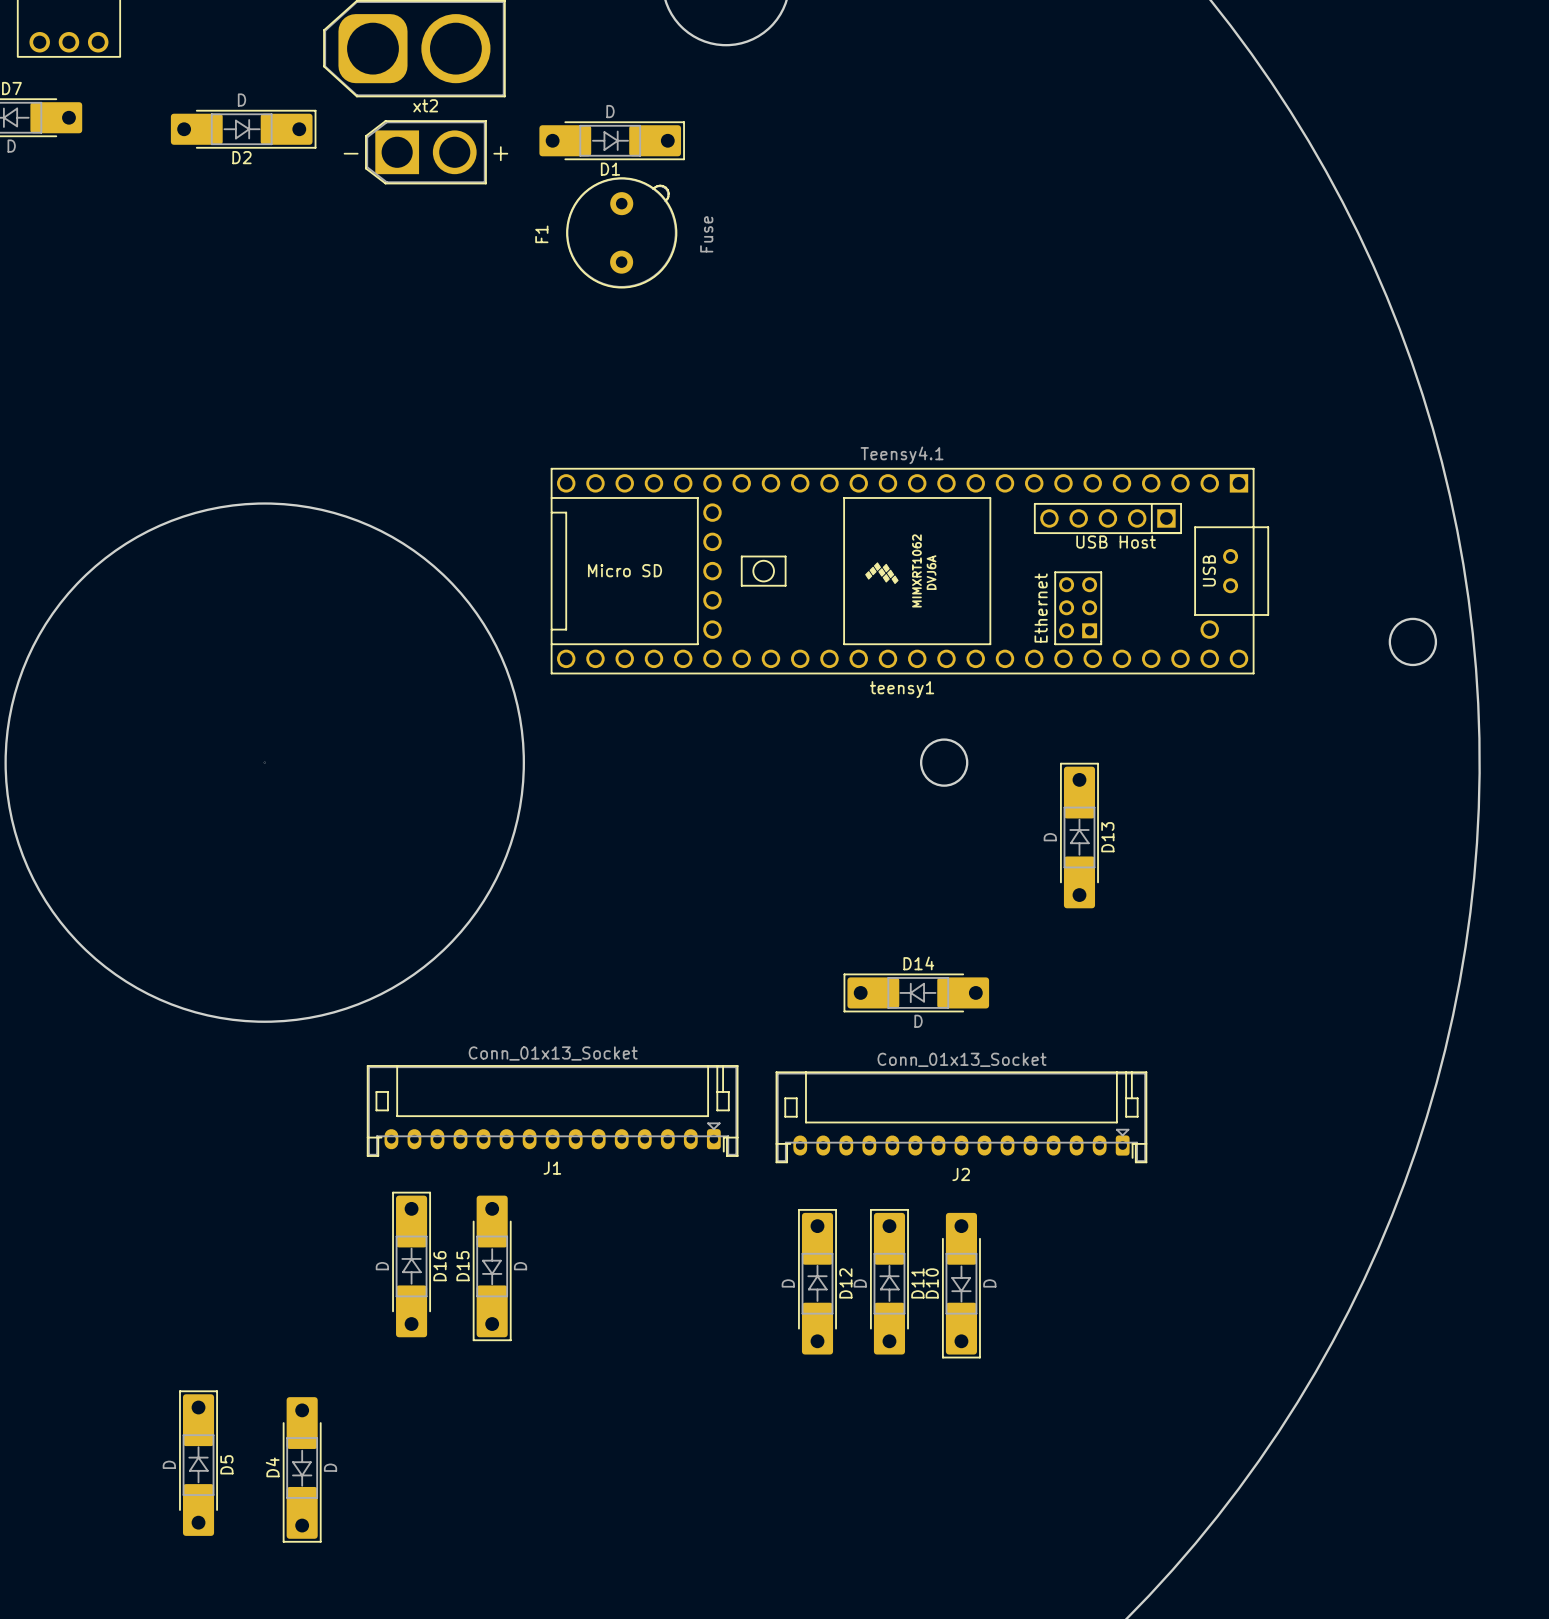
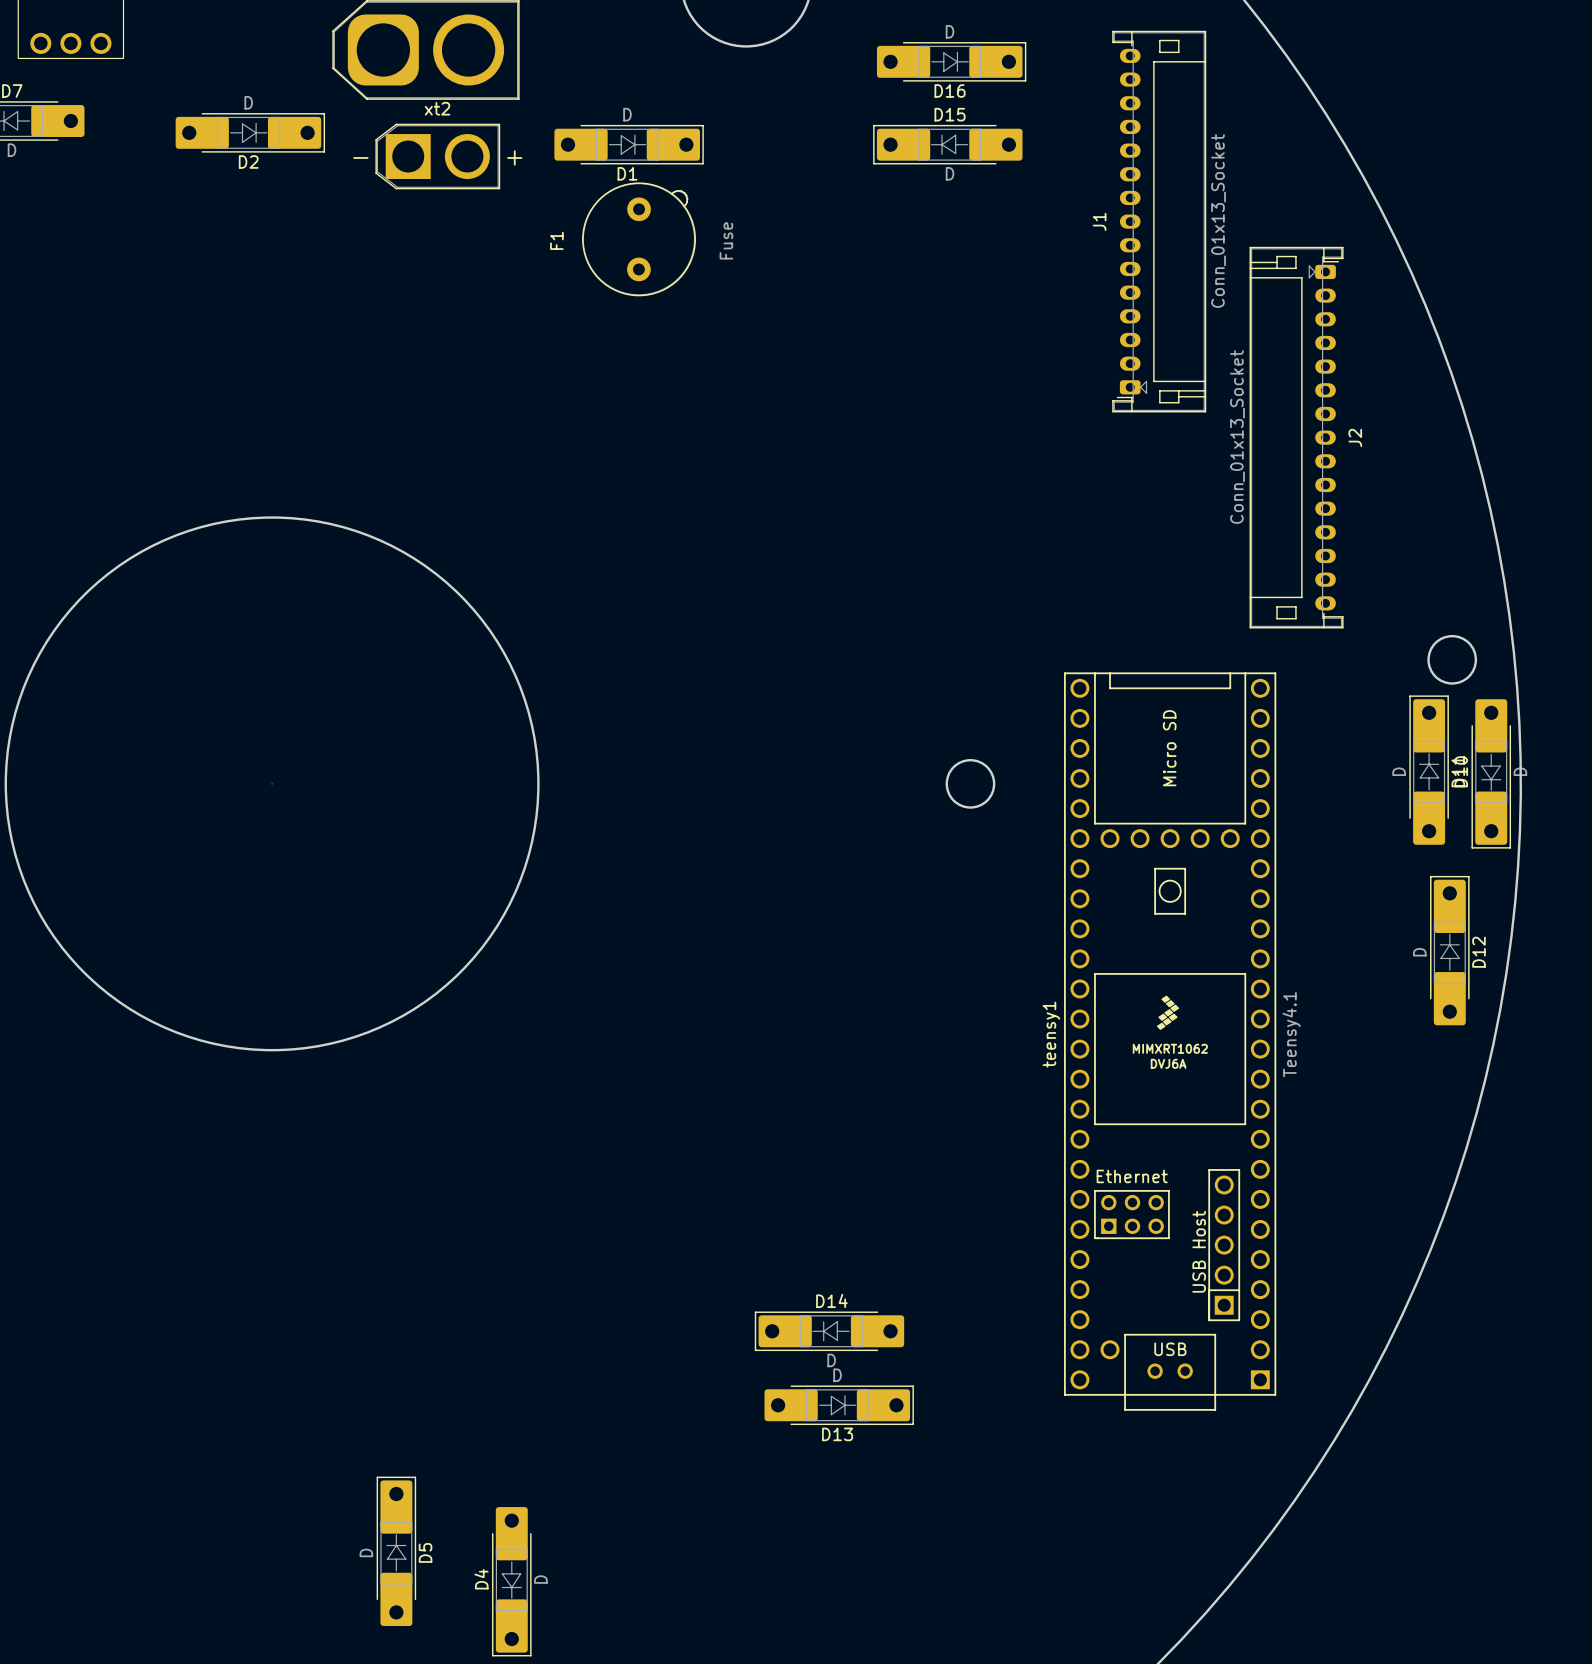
teensy1 rotation: 0° (909, 571) -> 90° clockwise (1170, 1041)
teensy1 position: (909, 571) -> (1170, 1041)
D13 rotation: 0° (1079, 835) -> 90° clockwise (839, 1405)
D13 position: (1079, 835) -> (839, 1405)
D14 position: (916, 992) -> (829, 1331)
J1 rotation: 0° (552, 1110) -> 90° clockwise (1159, 221)
J1 position: (552, 1110) -> (1159, 221)
J2 rotation: 0° (961, 1117) -> 90° counterclockwise (1296, 437)
J2 position: (961, 1117) -> (1296, 437)
D16 rotation: 0° (411, 1264) -> 90° clockwise (951, 61)
D16 position: (411, 1264) -> (951, 61)
D15 rotation: 0° (492, 1268) -> 90° clockwise (947, 144)
D15 position: (492, 1268) -> (947, 144)
D12 position: (817, 1281) -> (1449, 950)
D11 position: (889, 1281) -> (1429, 770)
D10 position: (961, 1285) -> (1491, 773)
D5 position: (198, 1463) -> (396, 1551)
D4 position: (302, 1469) -> (511, 1581)

